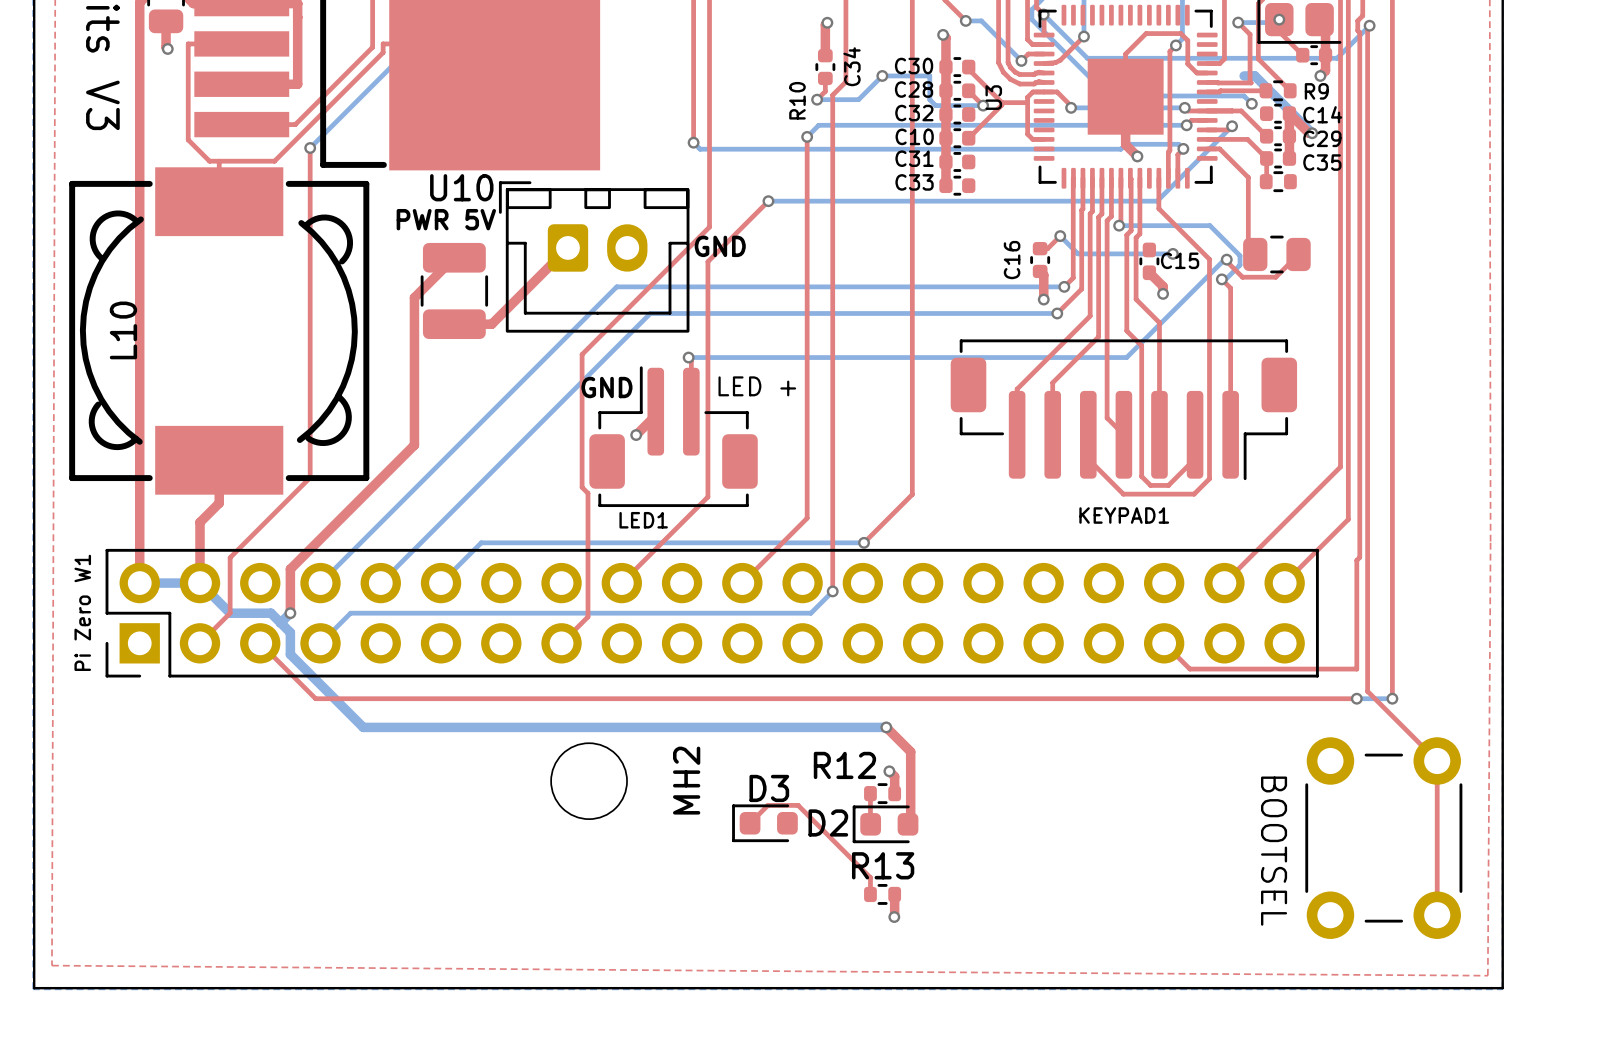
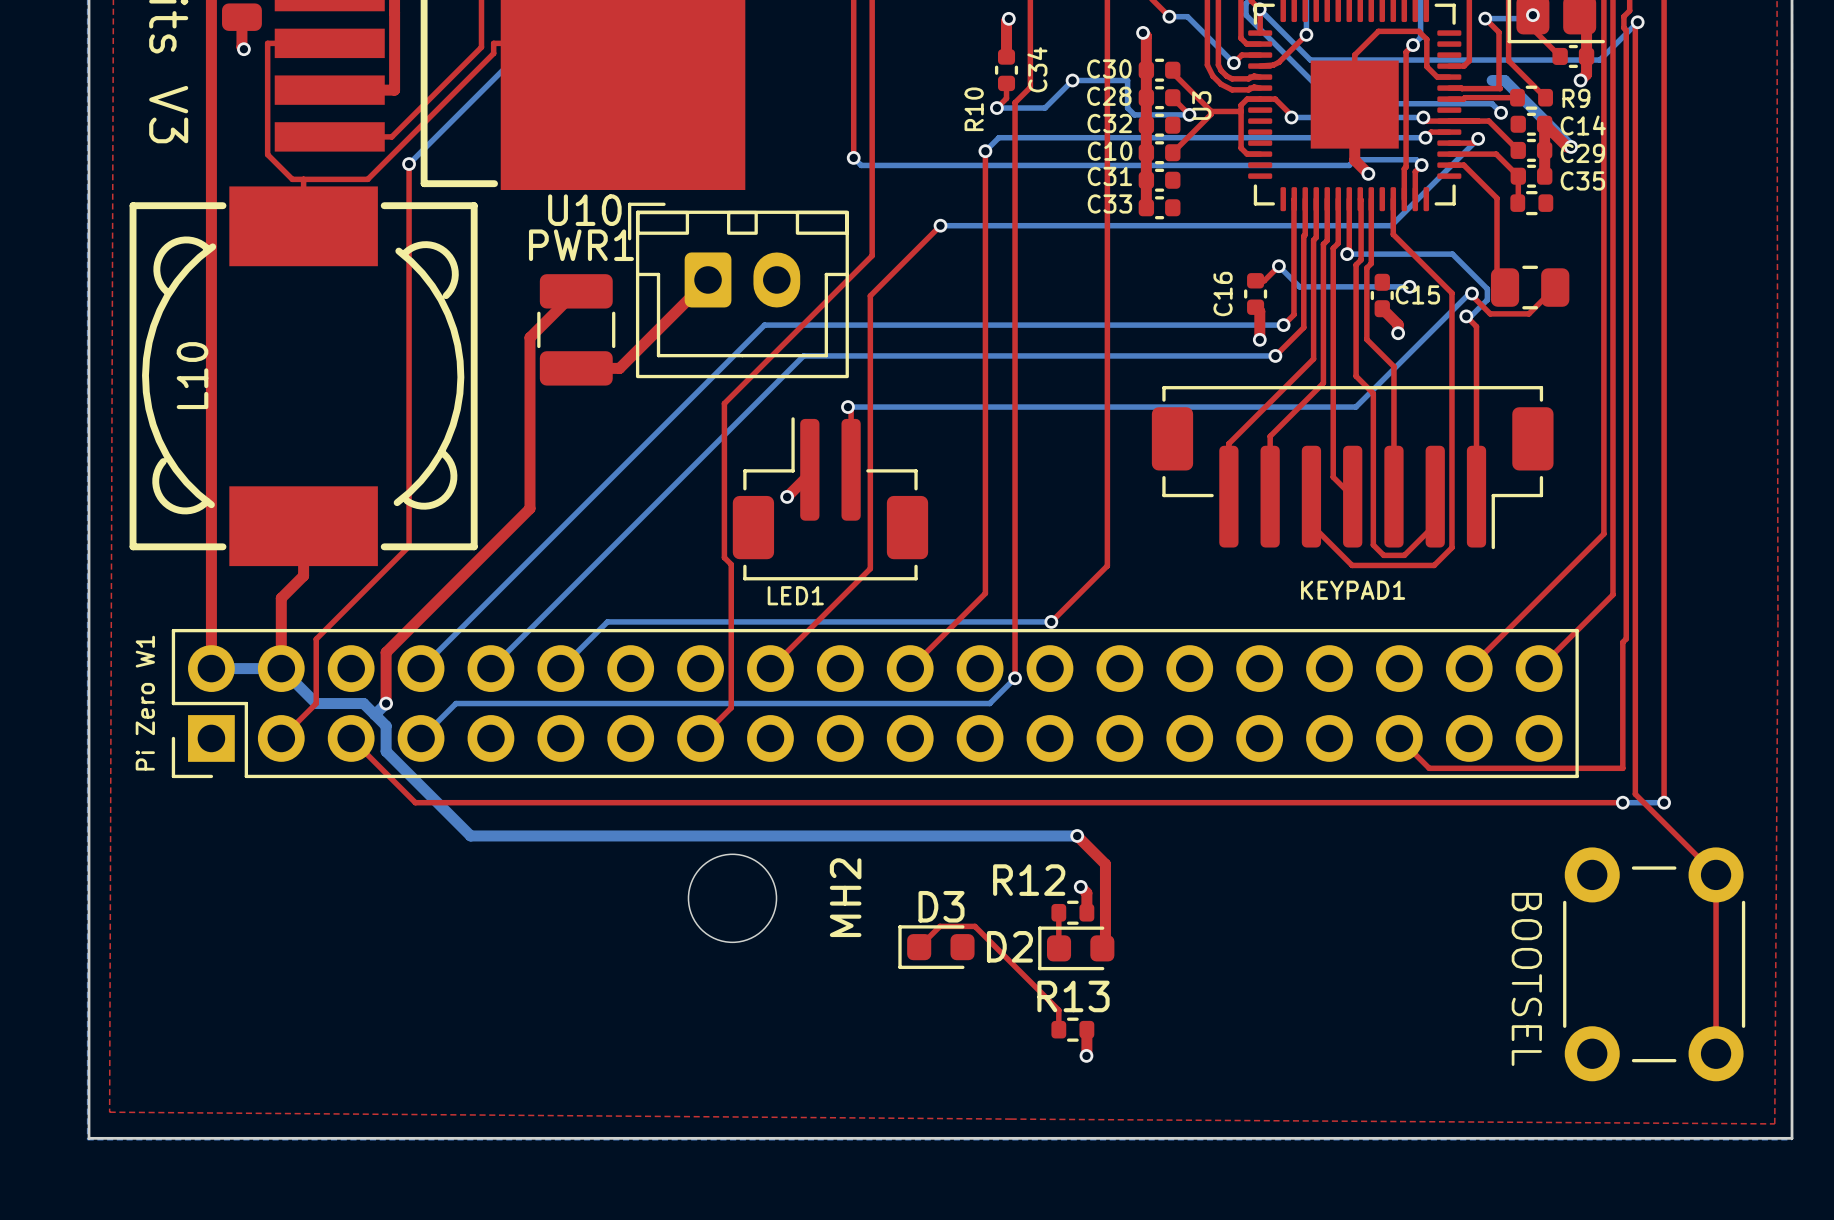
PWR1 name: none -> PWR1 (581, 245)
text: PWR 5V (446, 219) -> none
text: GND (720, 246) -> none
text: LED + (757, 386) -> none
text: GND (606, 387) -> none

